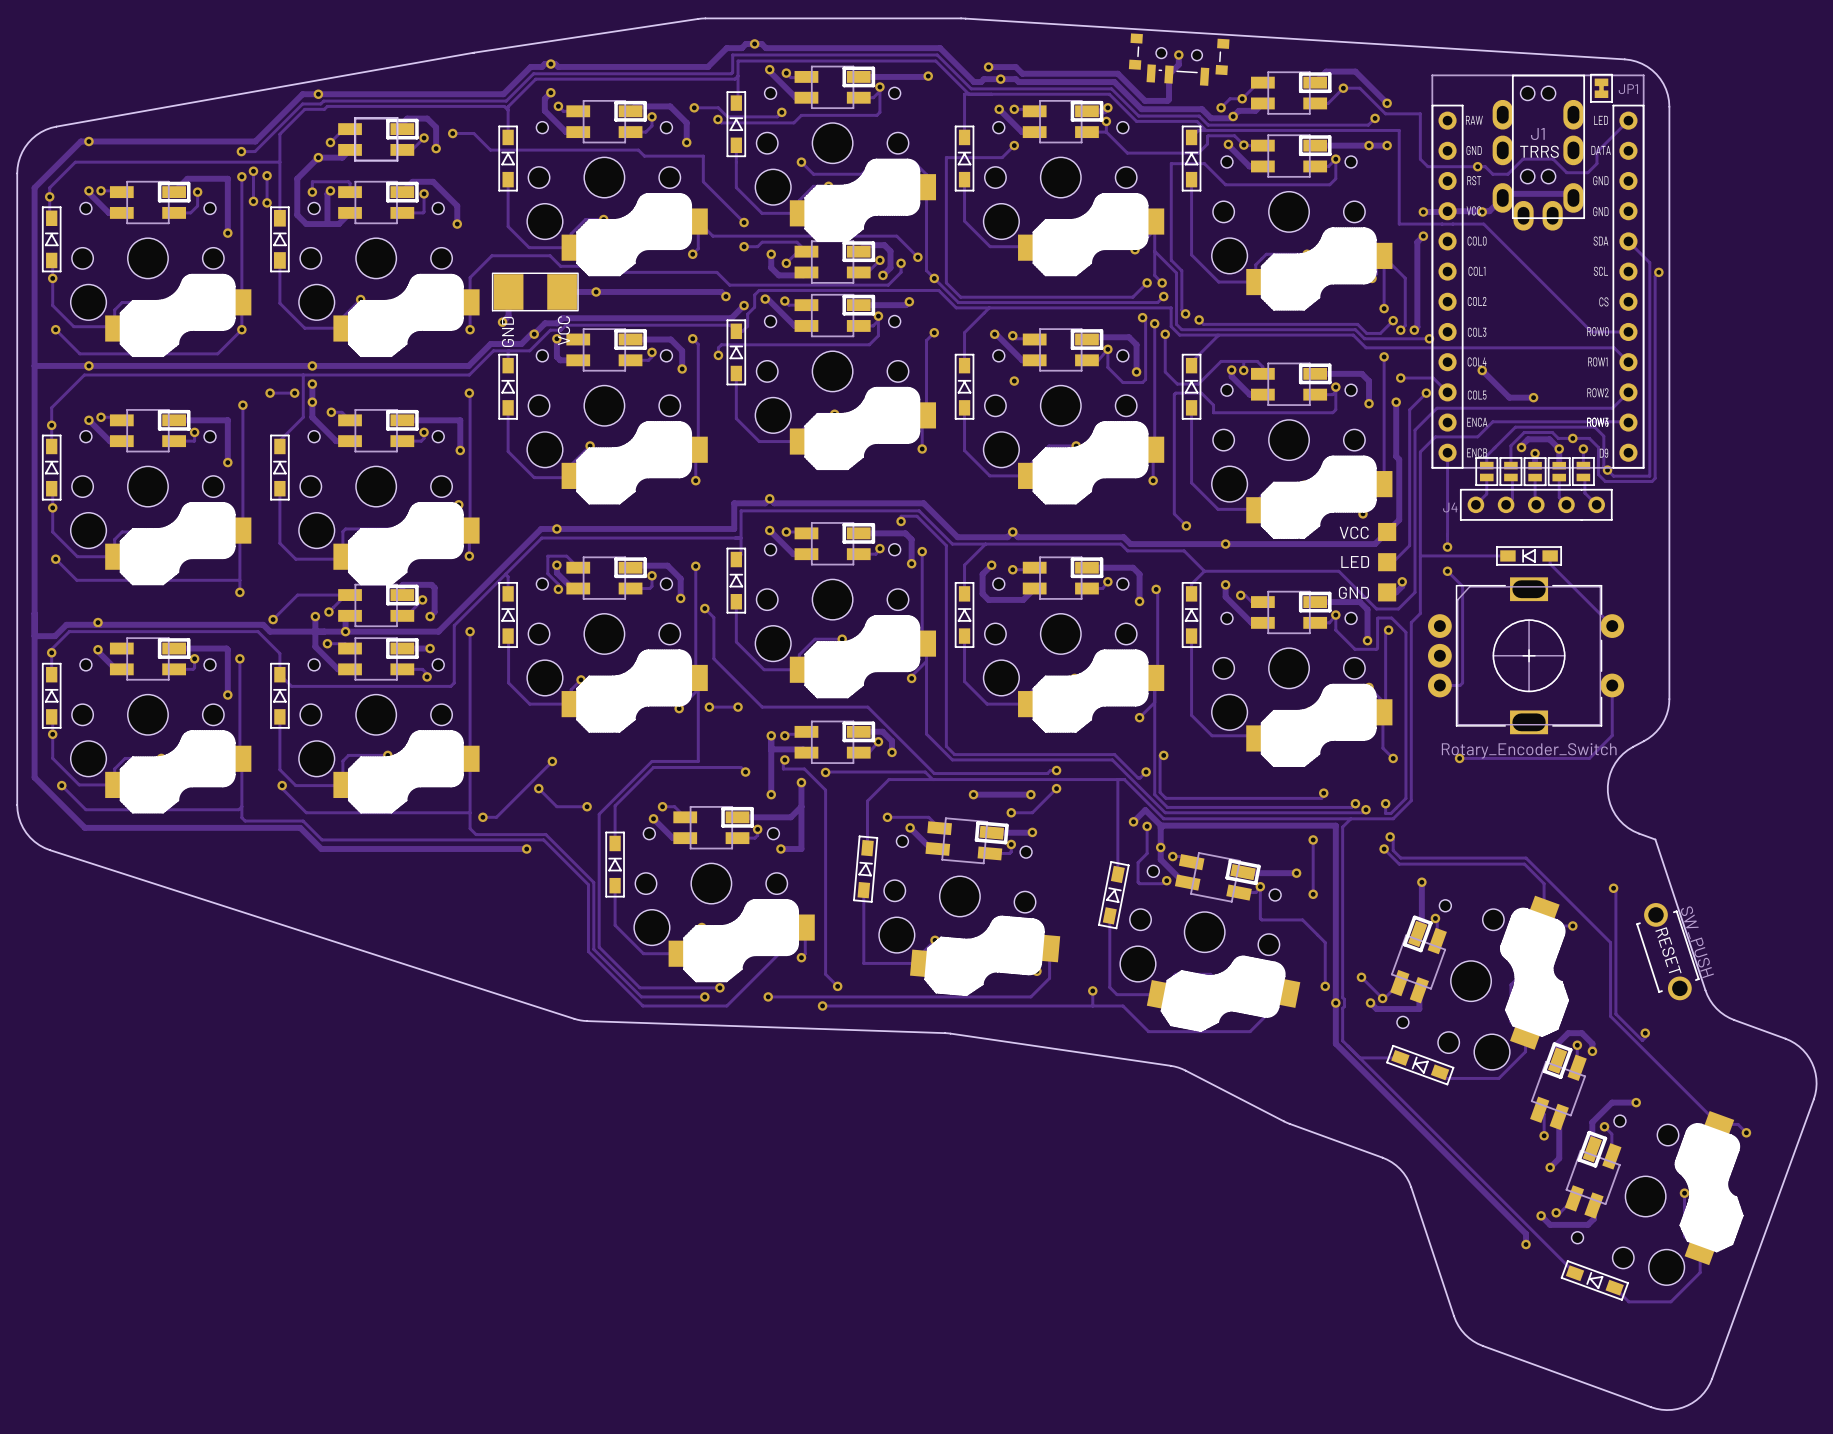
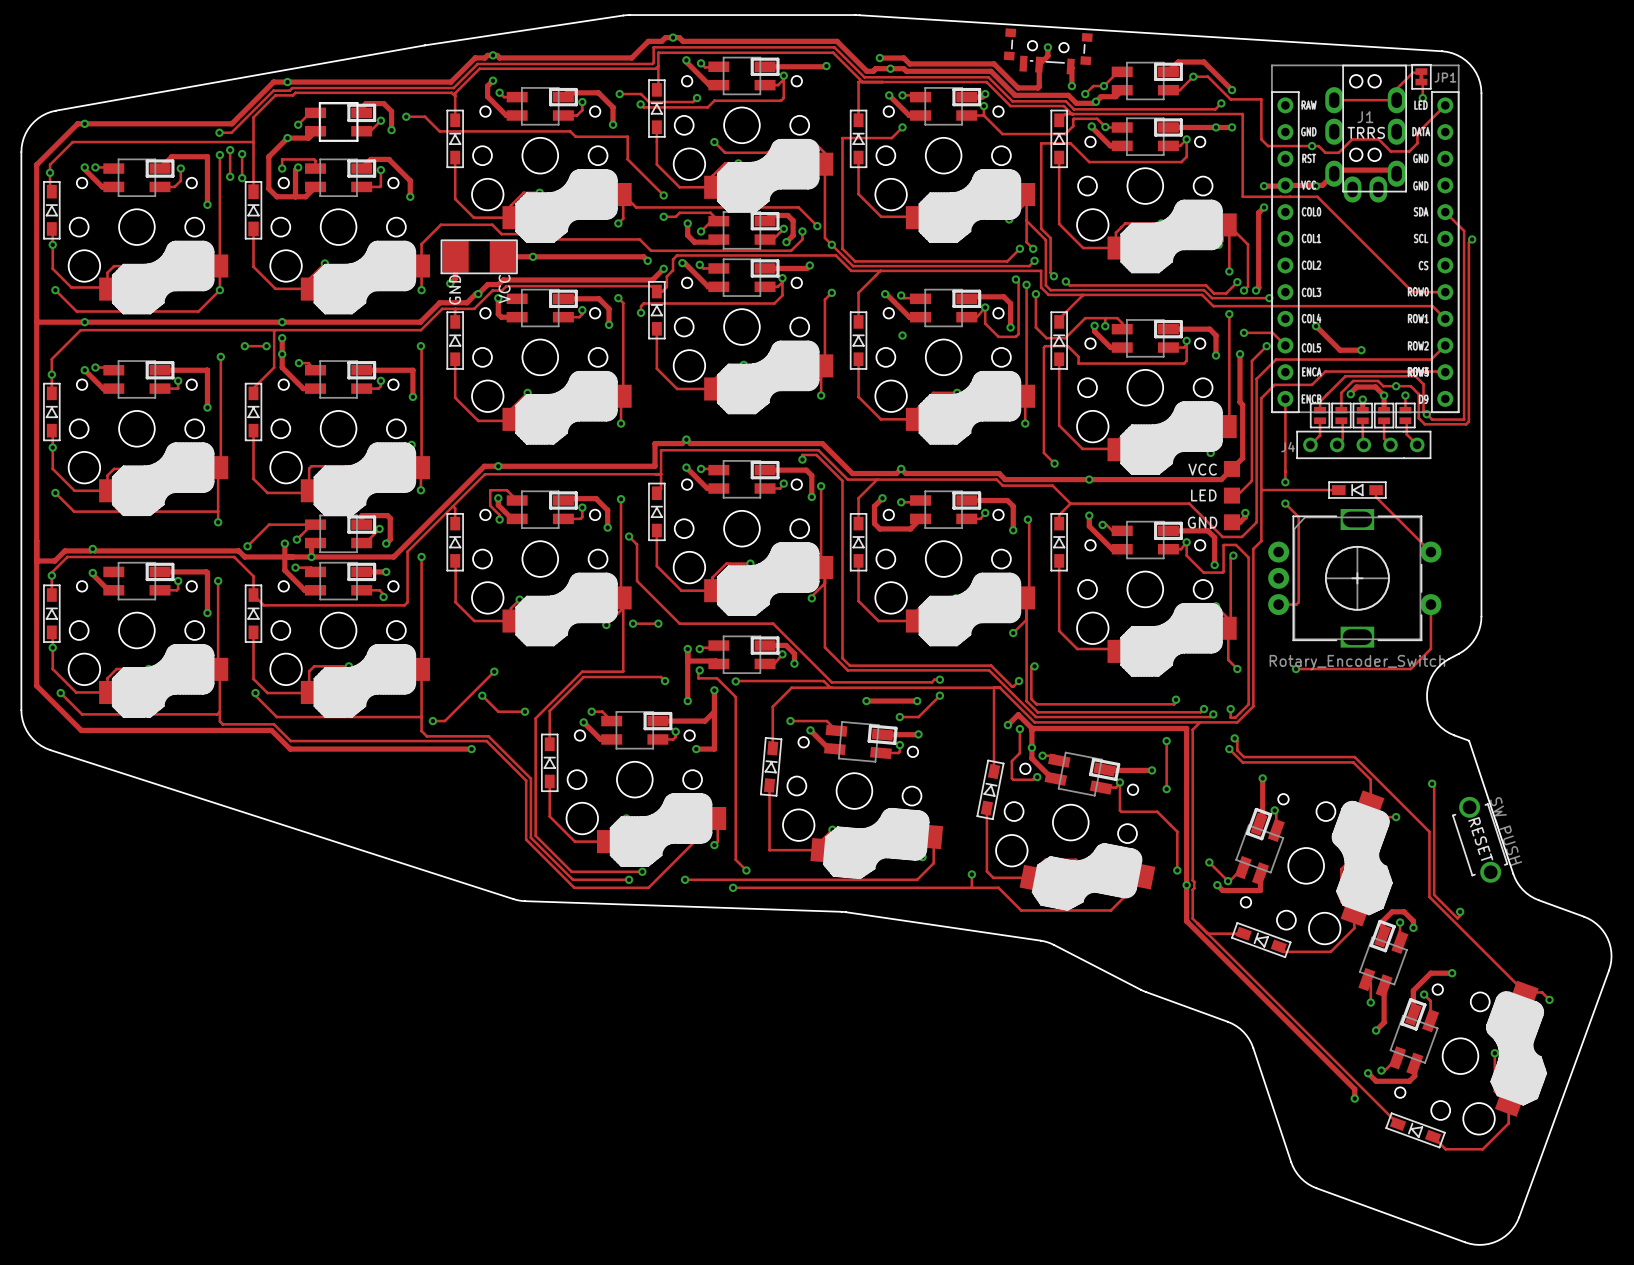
track: none -> (1070, 66) (1071, 86)
track: none -> (1421, 72) (1412, 72) (1396, 88) (1396, 100) (1334, 100)
track: none -> (1421, 82) (1422, 98)
via: none -> (1071, 86)
via: none -> (1422, 98)

